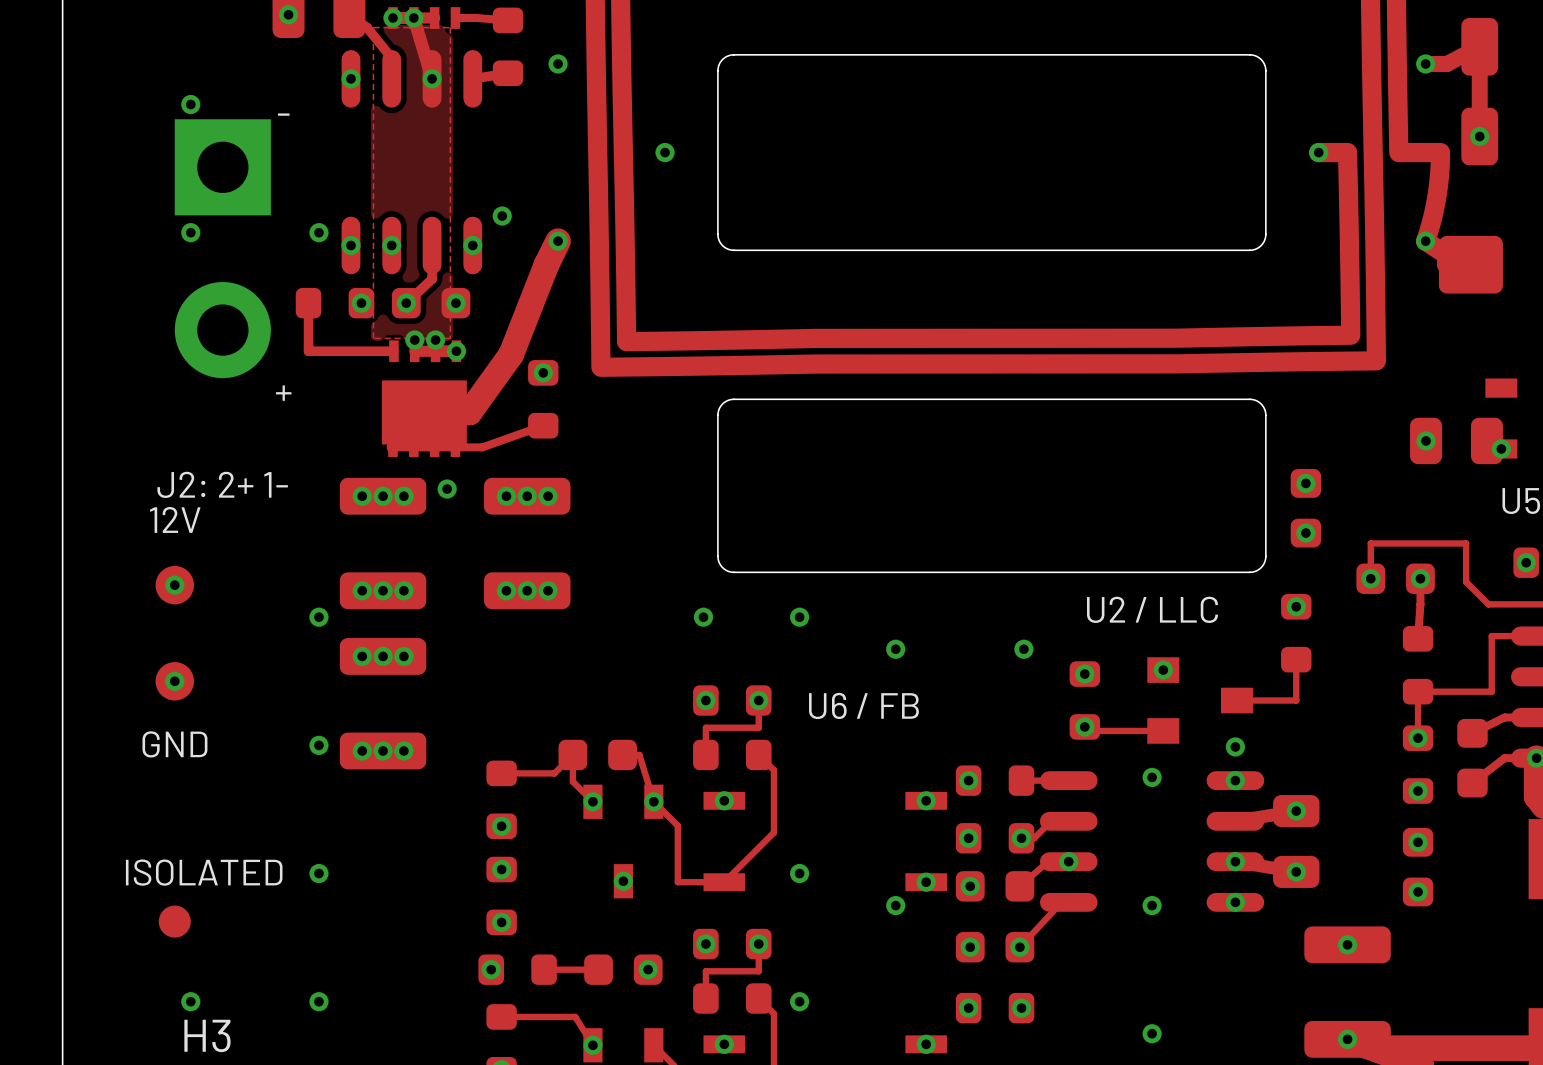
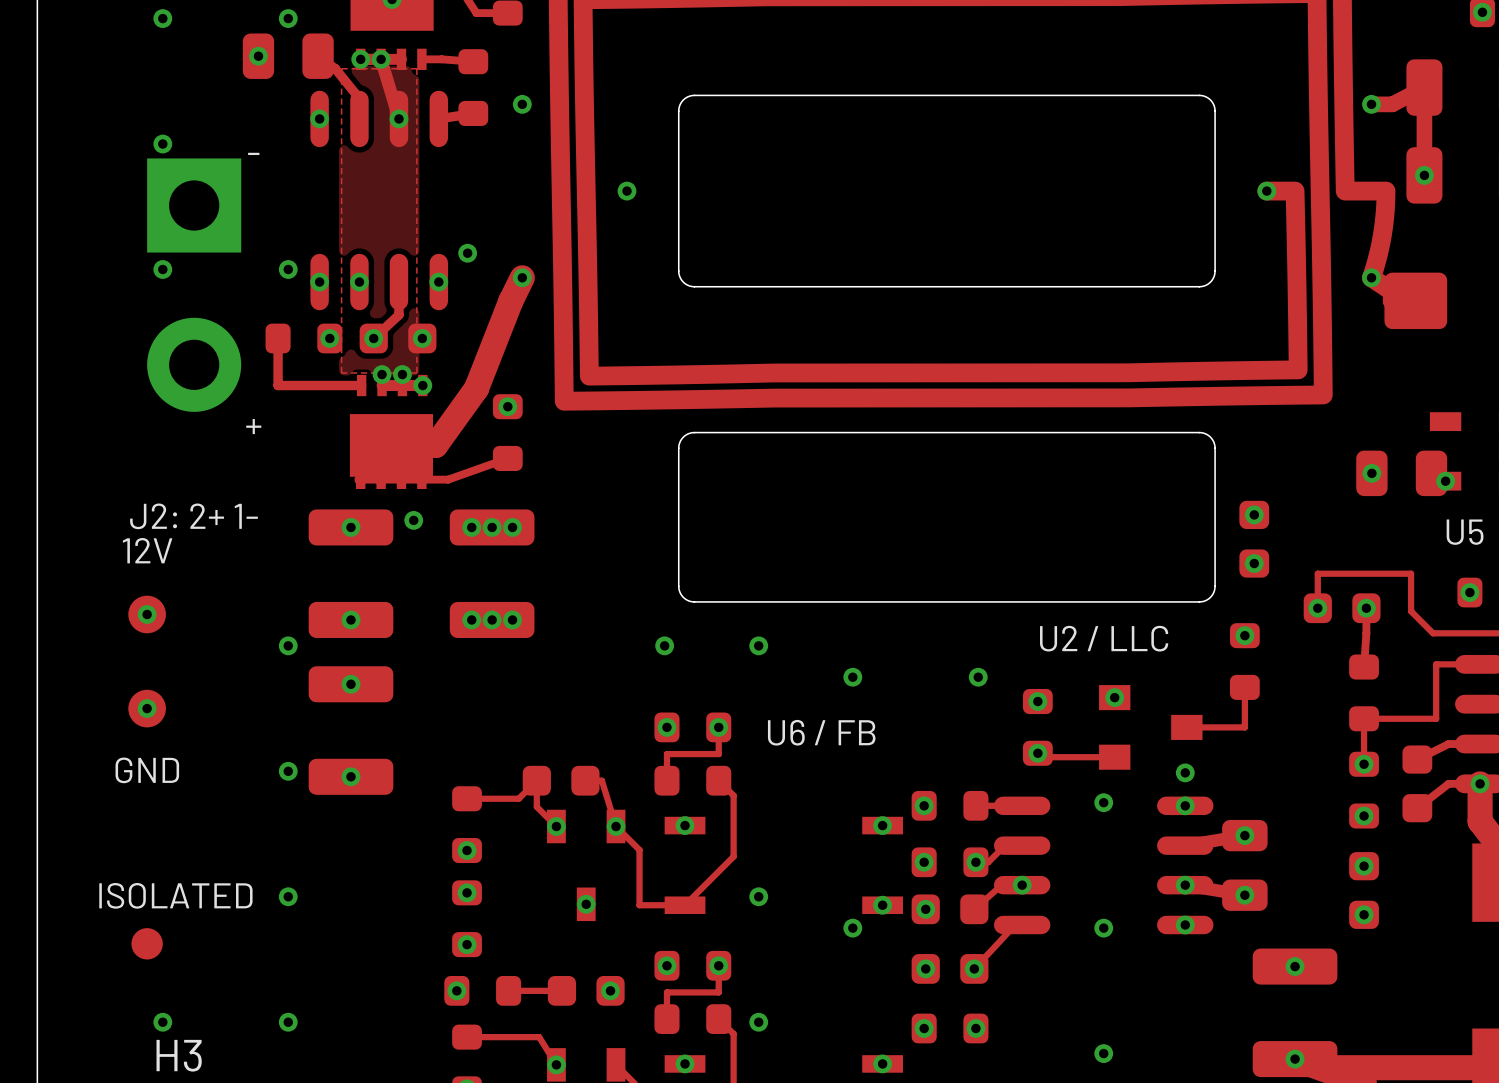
via: (362, 496) -> none
via: (403, 496) -> none
via: (362, 590) -> none
via: (403, 590) -> none
via: (362, 656) -> none
via: (403, 656) -> none
via: (362, 750) -> none
via: (403, 750) -> none

